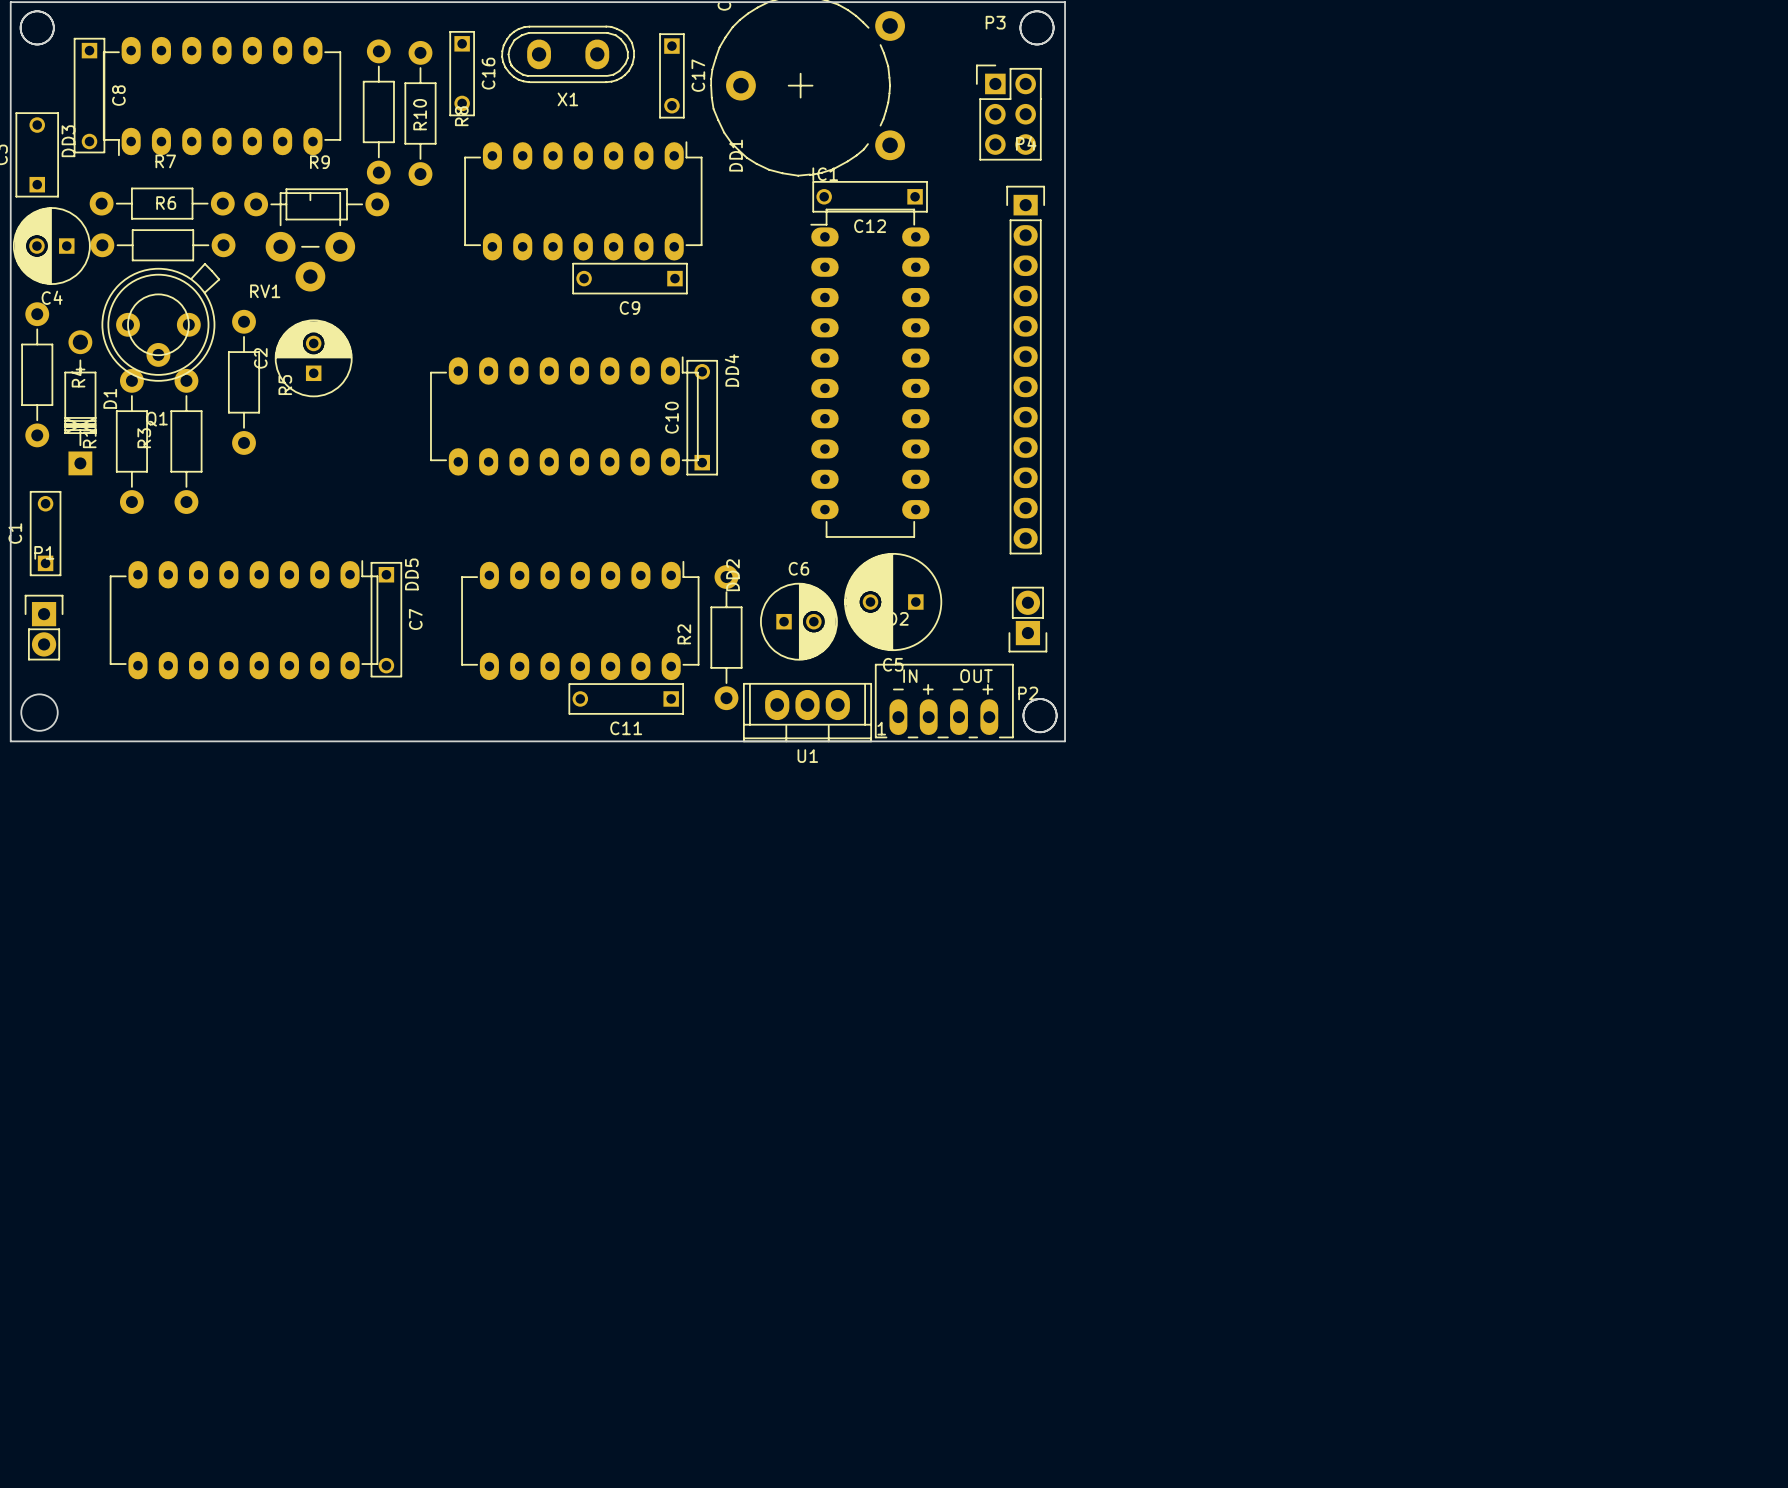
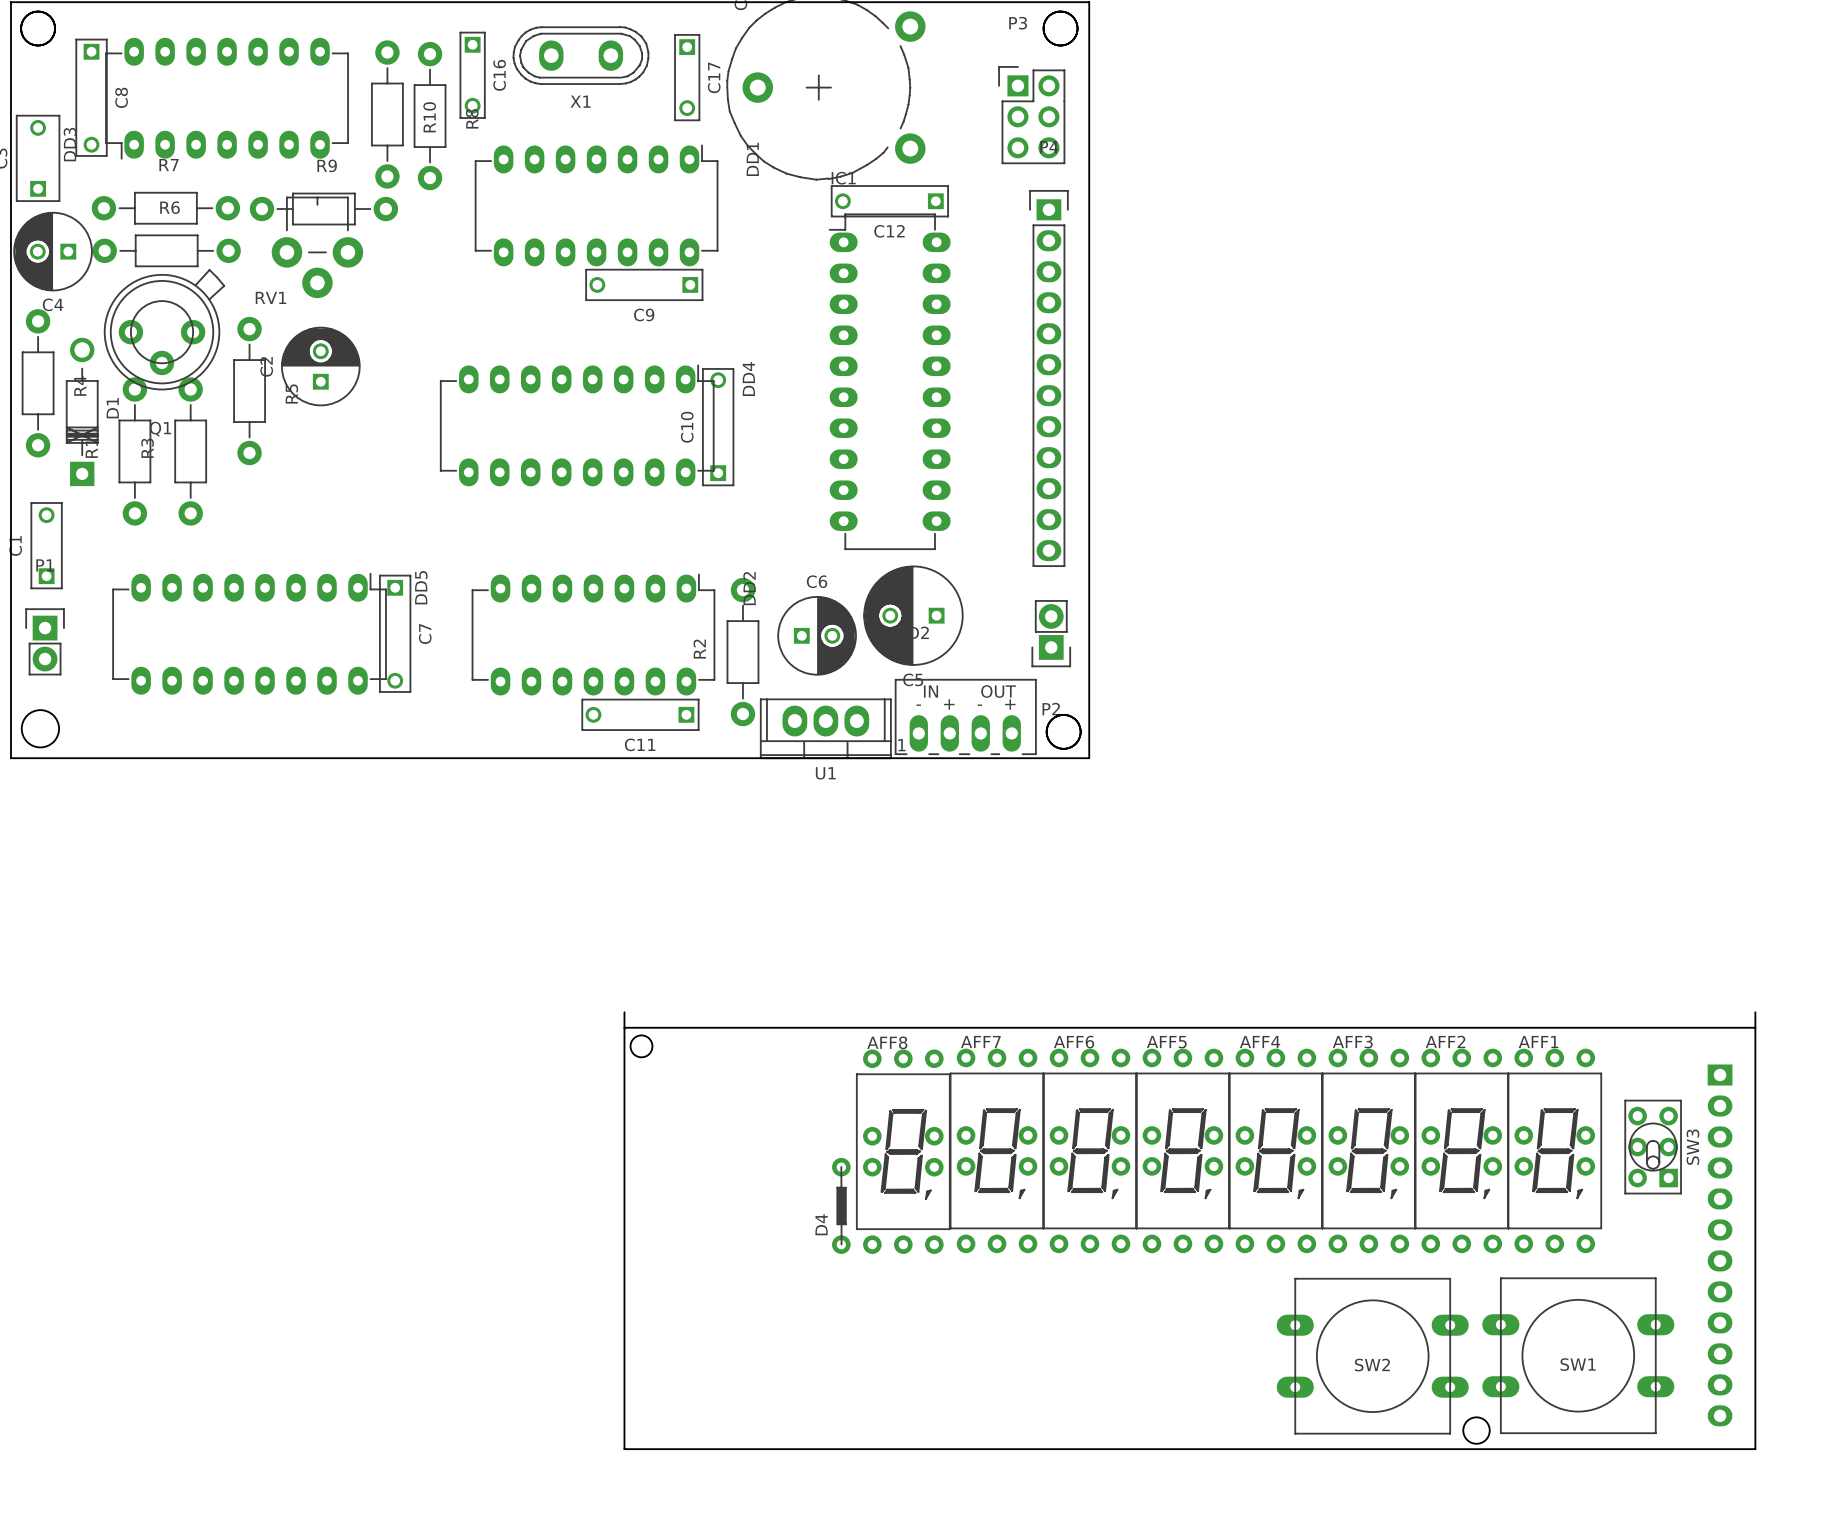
board edge: none -> (624, 1012) (624, 1449) (1755, 1449) (1755, 1012)
board edge: none -> (624, 1027) (1755, 1027)
round board edge: none -> [629, 1034, 654, 1059]
SW3: none -> (1653, 1147)
AFF7: none -> (997, 1150)
AFF6: none -> (1089, 1150)
AFF5: none -> (1182, 1150)
AFF4: none -> (1275, 1150)
AFF3: none -> (1368, 1150)
AFF2: none -> (1461, 1150)
AFF1: none -> (1554, 1150)
AFF8: none -> (903, 1151)
D4: none -> (841, 1205)
part: none -> (1720, 1245)
SW1: none -> (1578, 1355)
SW2: none -> (1372, 1356)
round board edge: none -> [1462, 1416, 1491, 1445]

